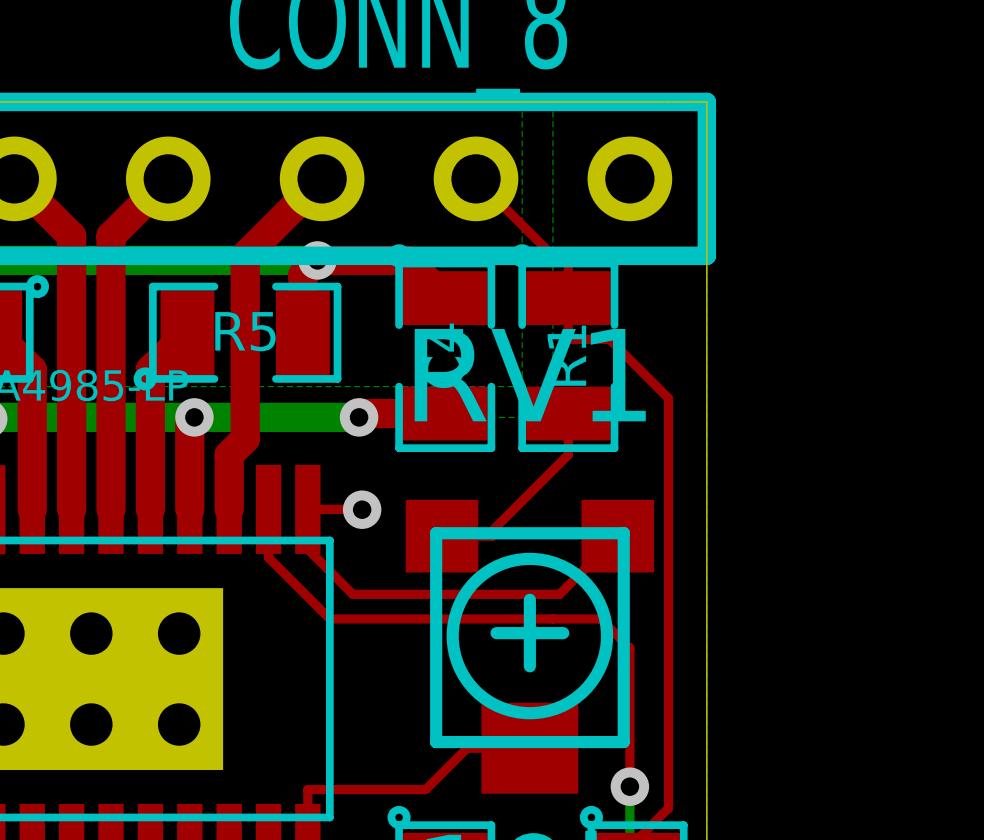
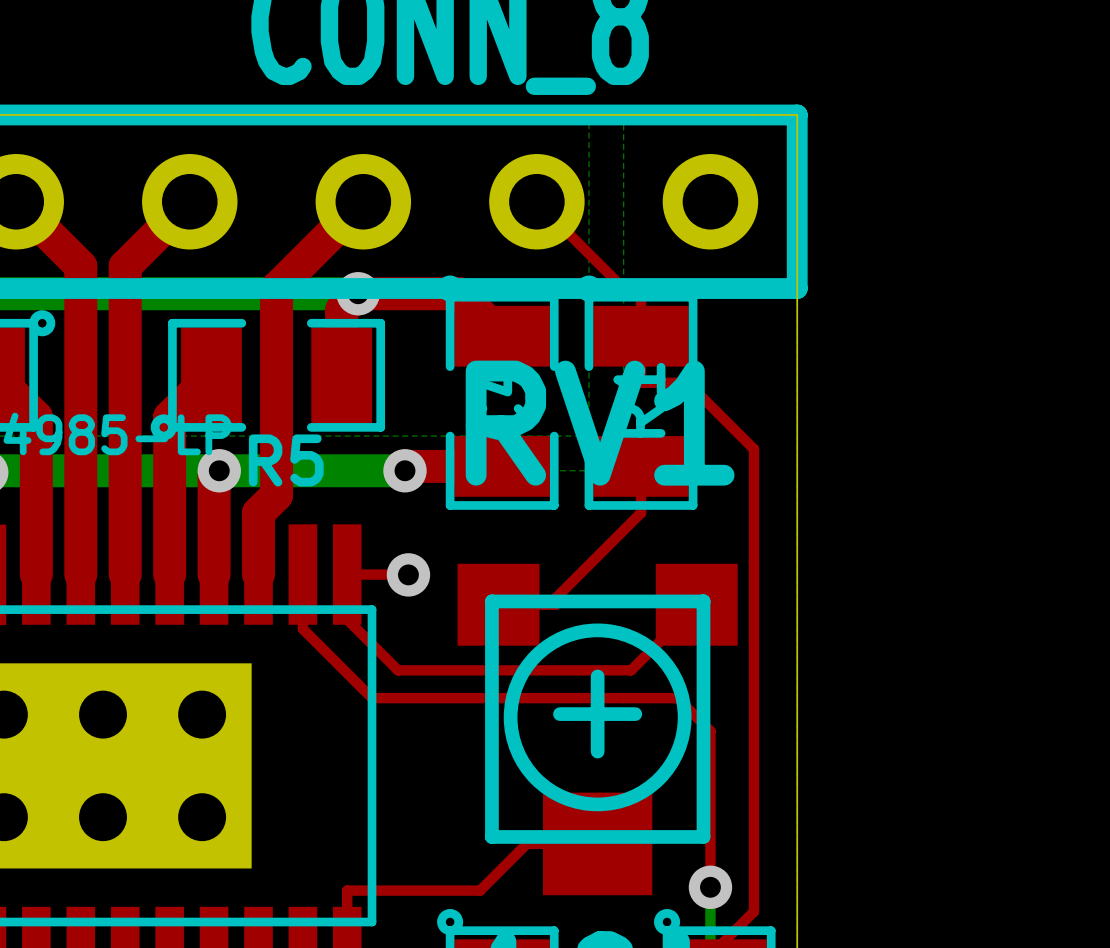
R5 name position: R5 (245, 331) -> R5 (286, 460)

